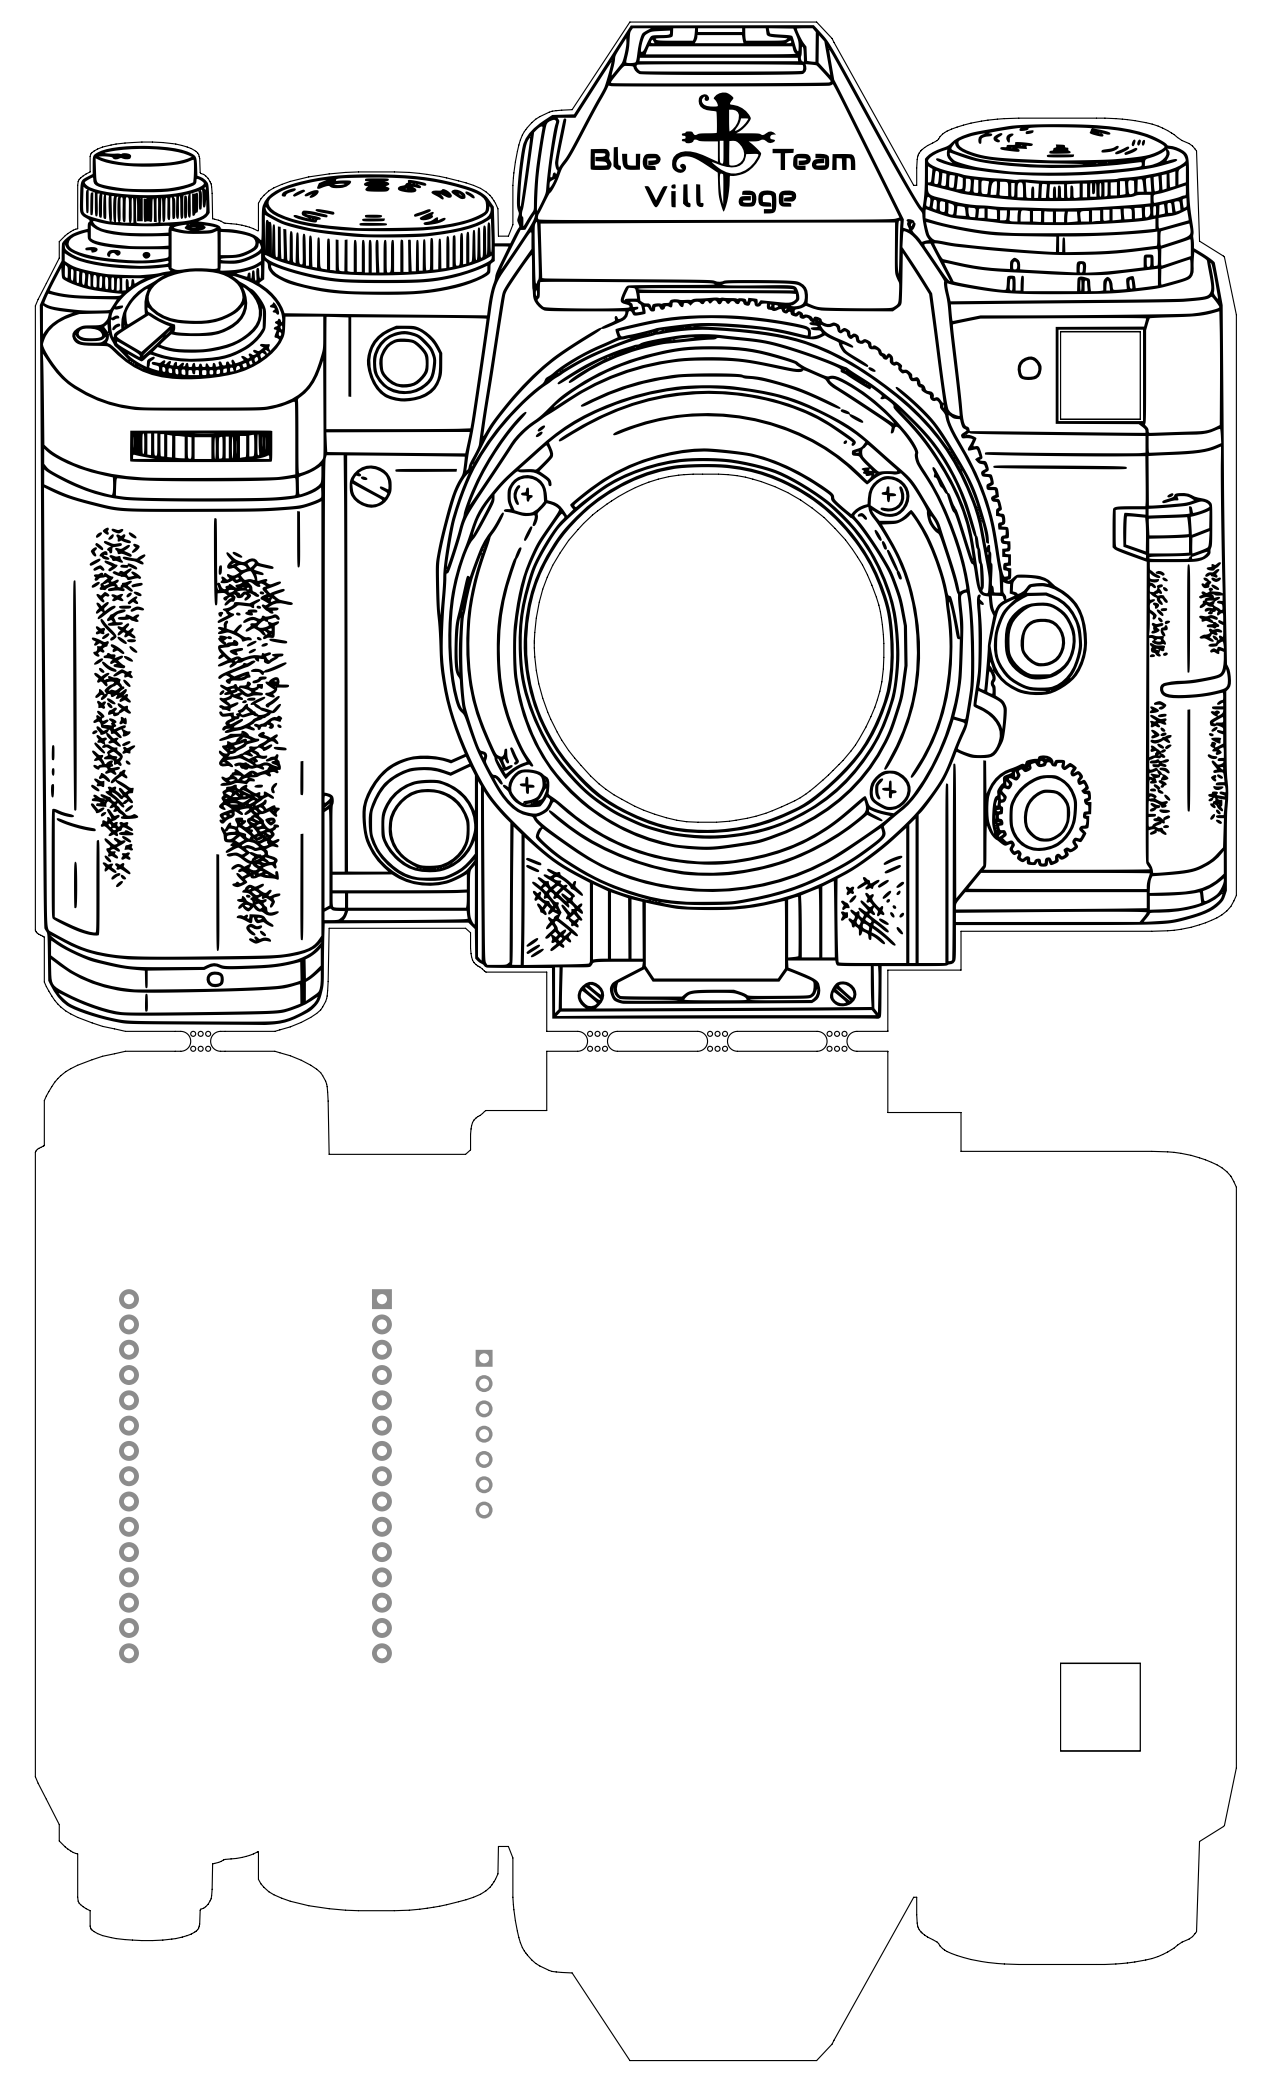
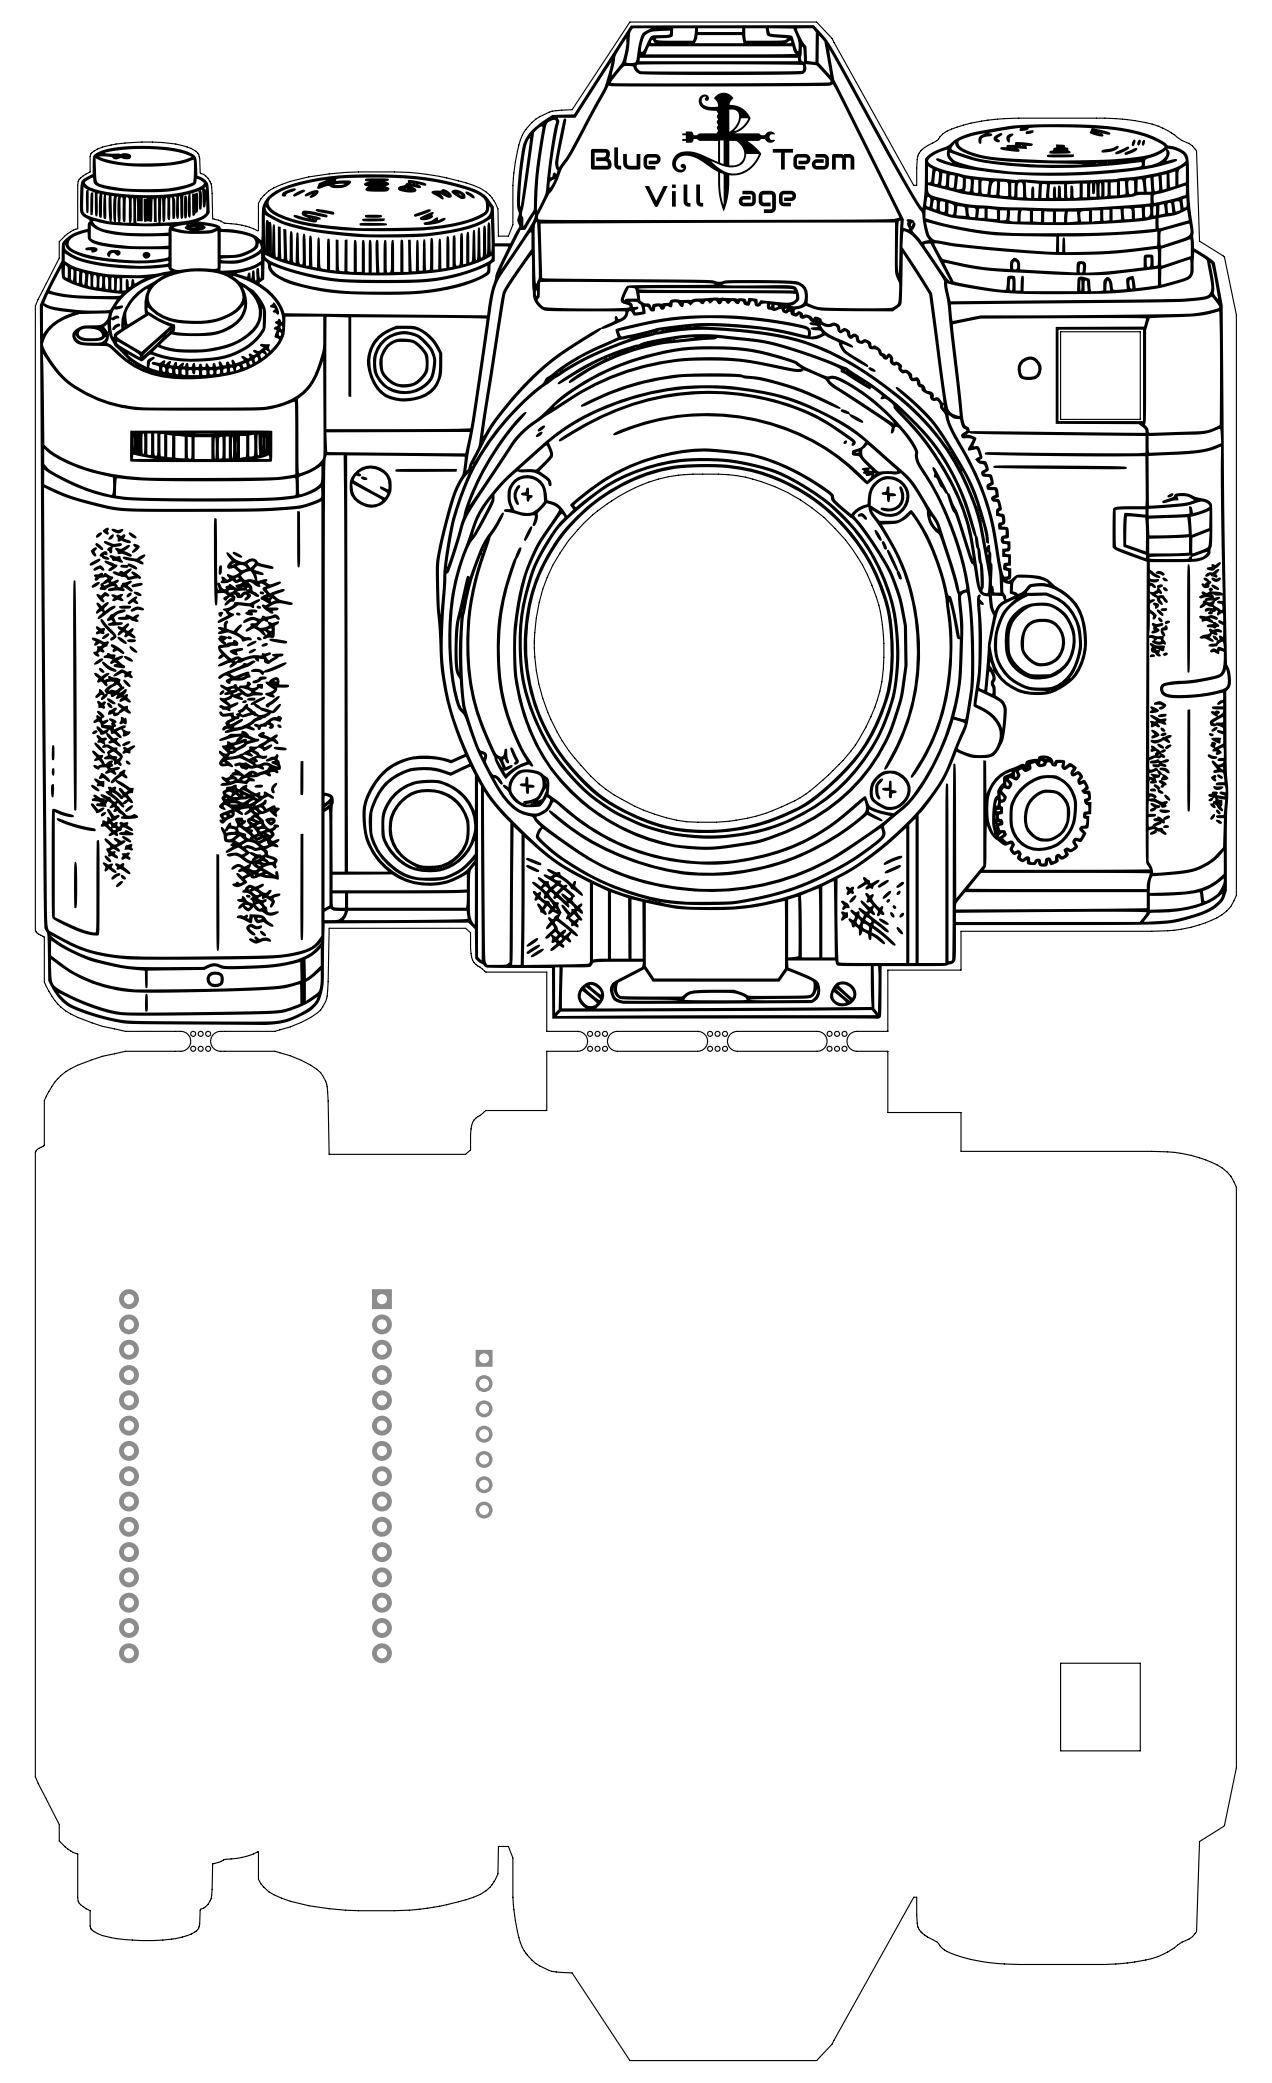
drawing: [39, 25, 1231, 1752] -> none
drawing: none -> [39, 25, 1231, 1026]

